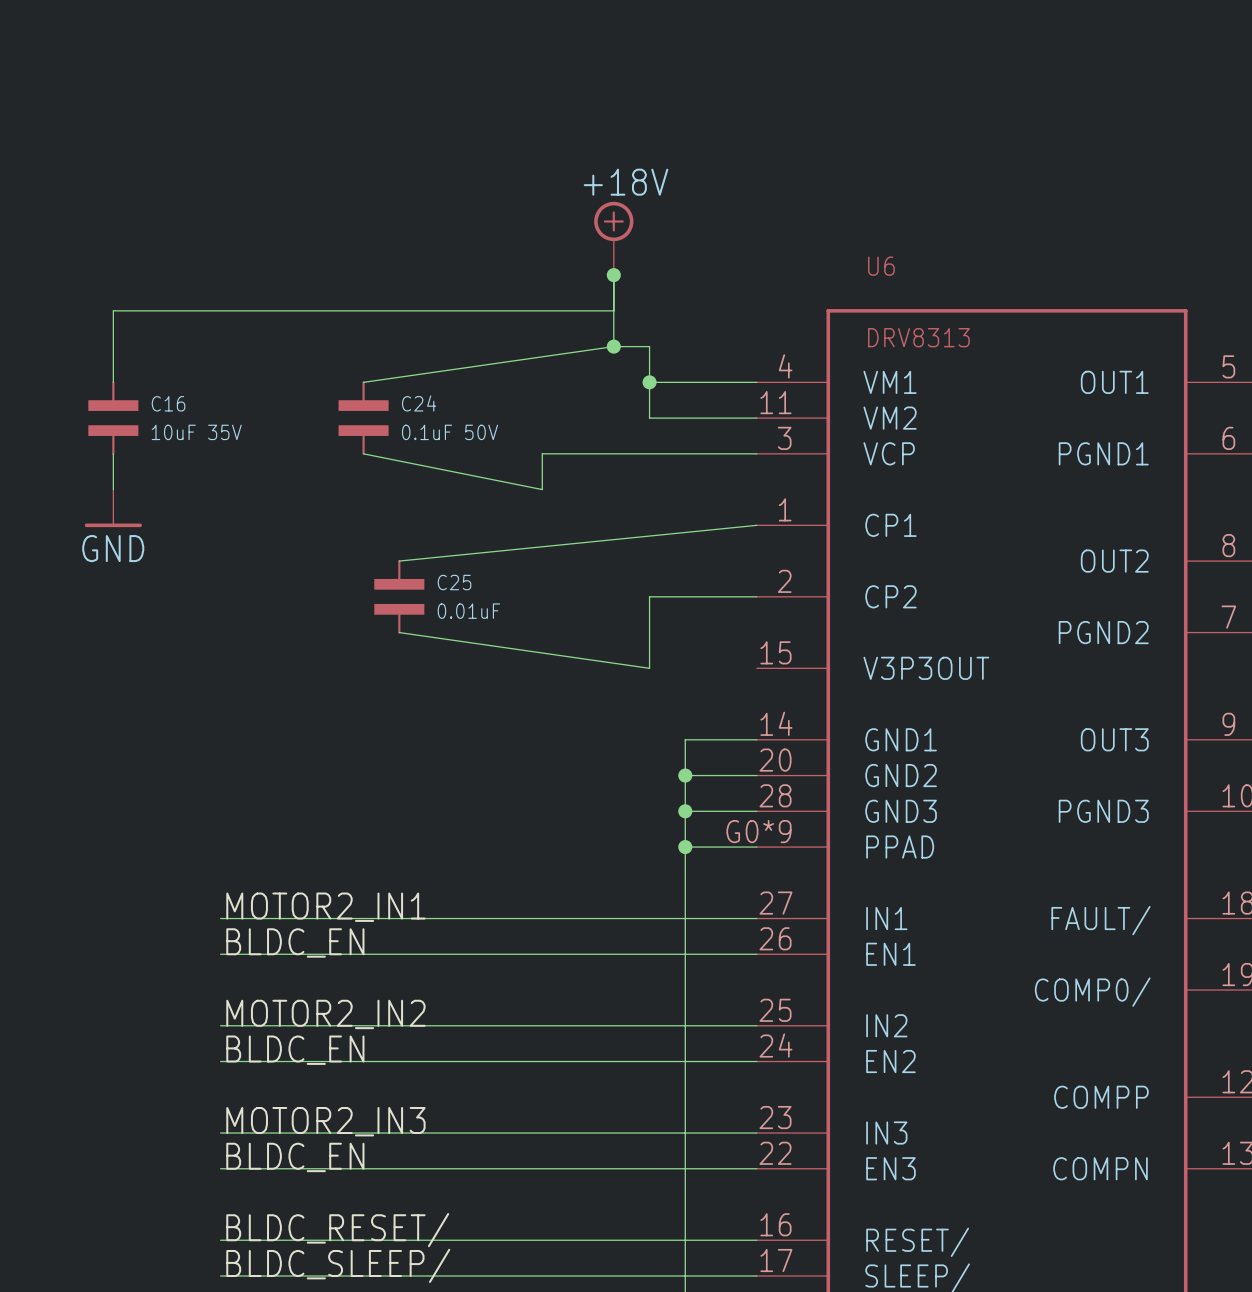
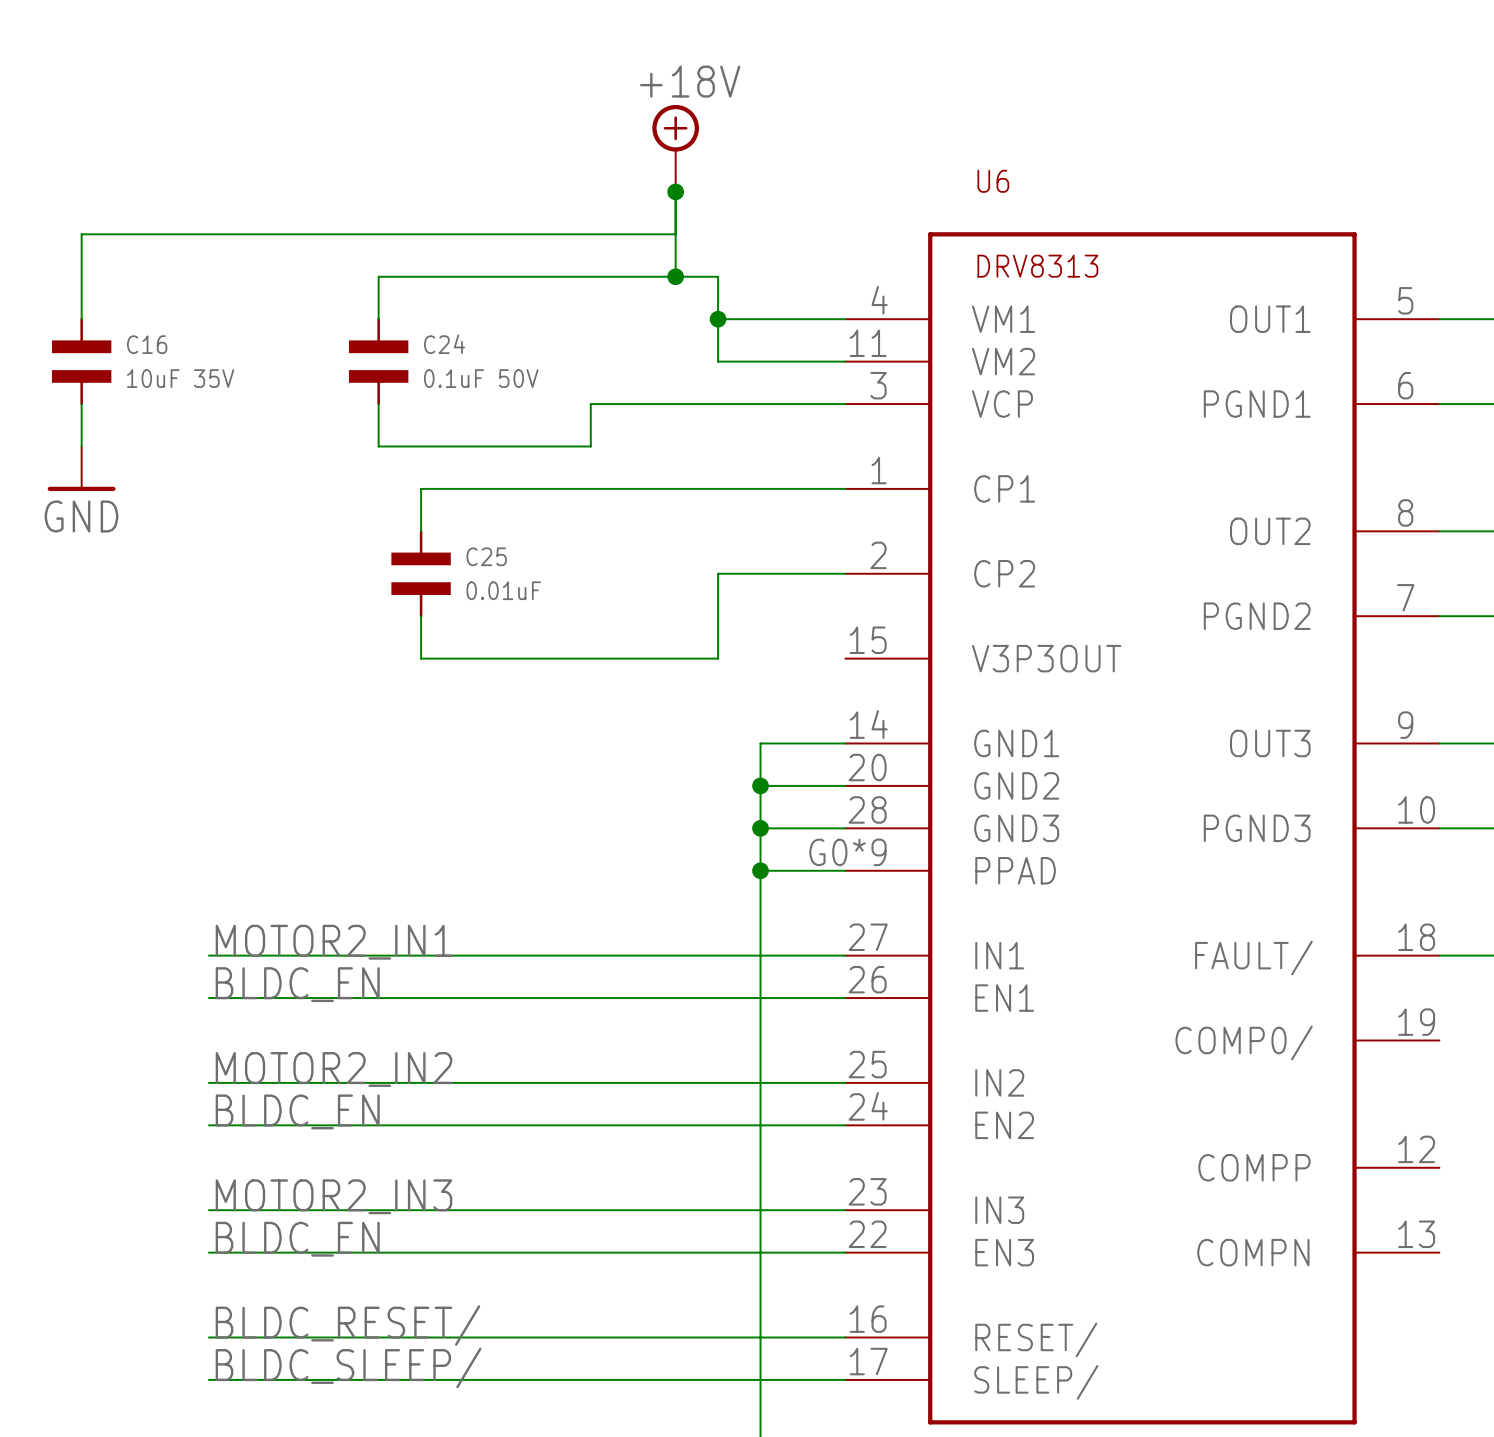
wire: (613, 346) (363, 382) -> (675, 276) (378, 276) (378, 319)
wire: (363, 453) (542, 489) -> (378, 404) (378, 446) (590, 446)
wire: (756, 525) (399, 561) -> (845, 488) (421, 488) (421, 531)
wire: (399, 632) (649, 668) -> (421, 616) (421, 658) (718, 658)

